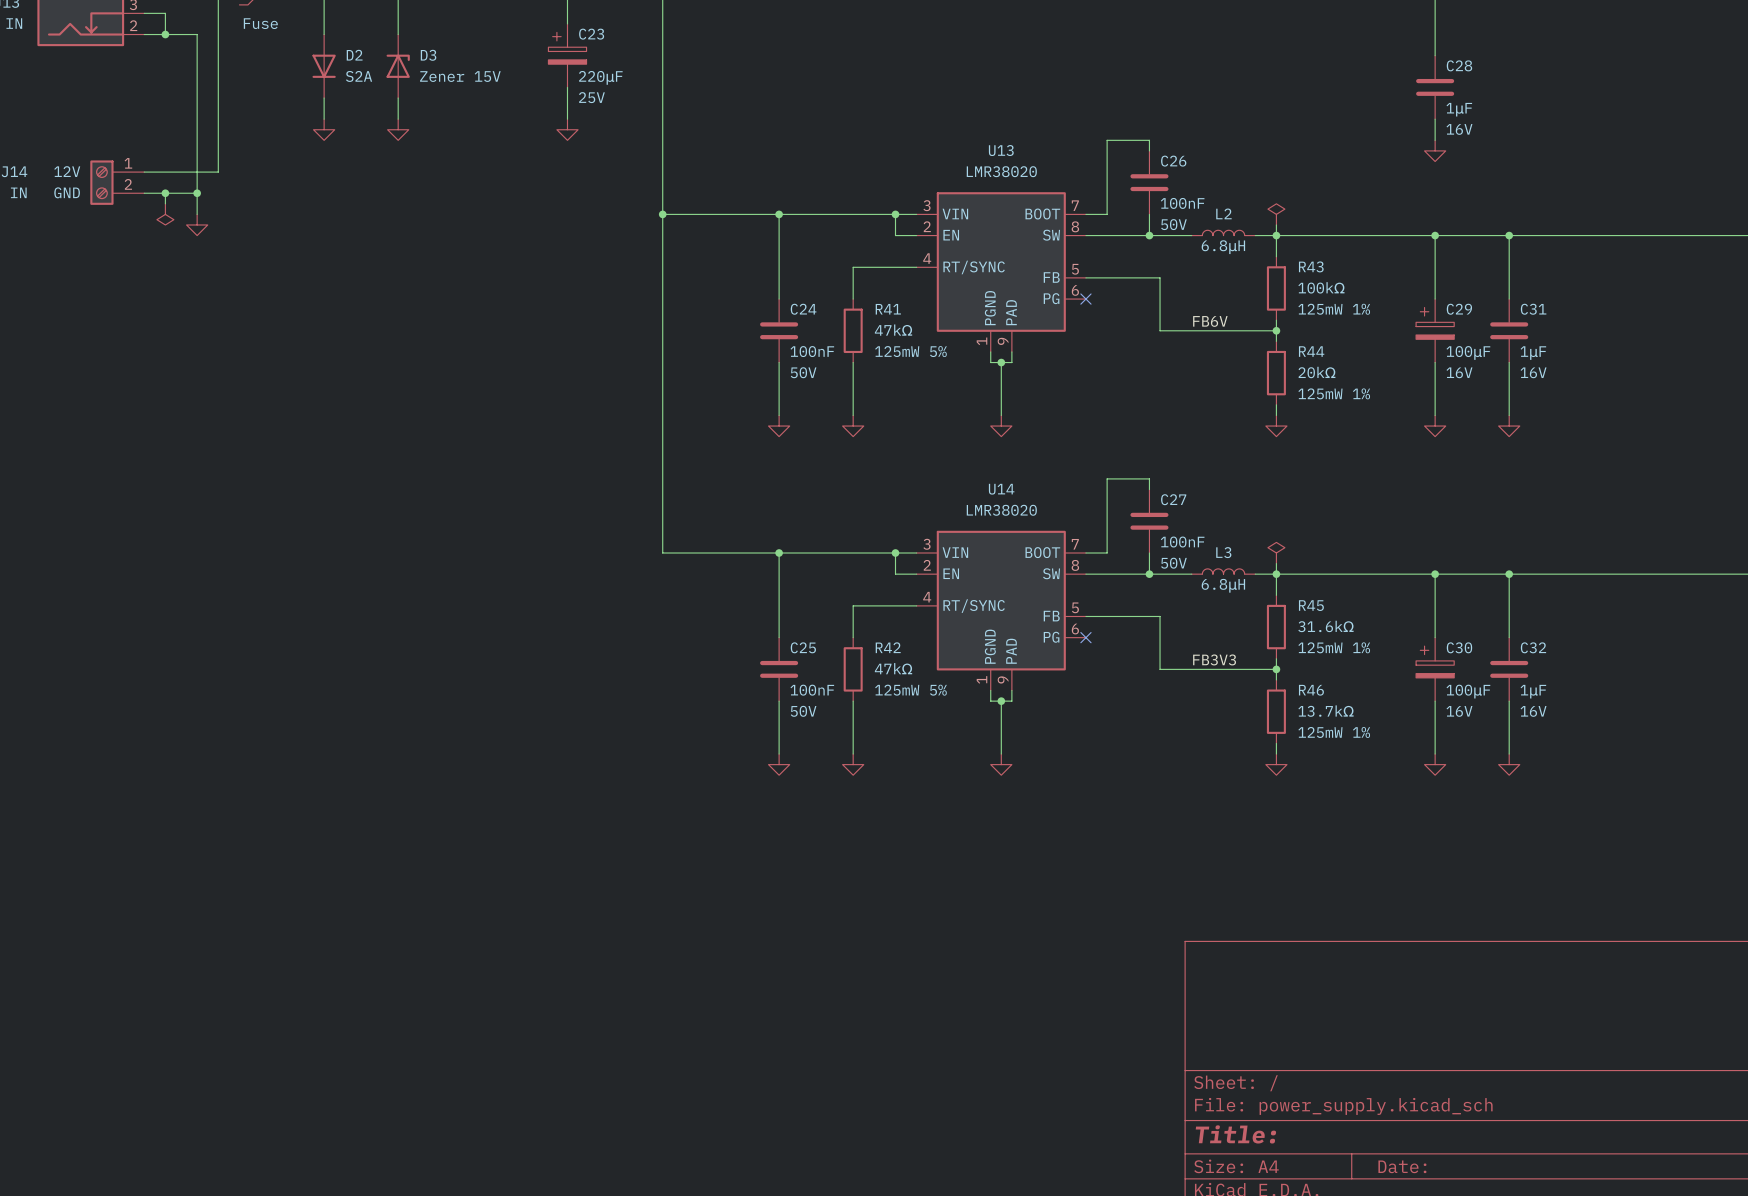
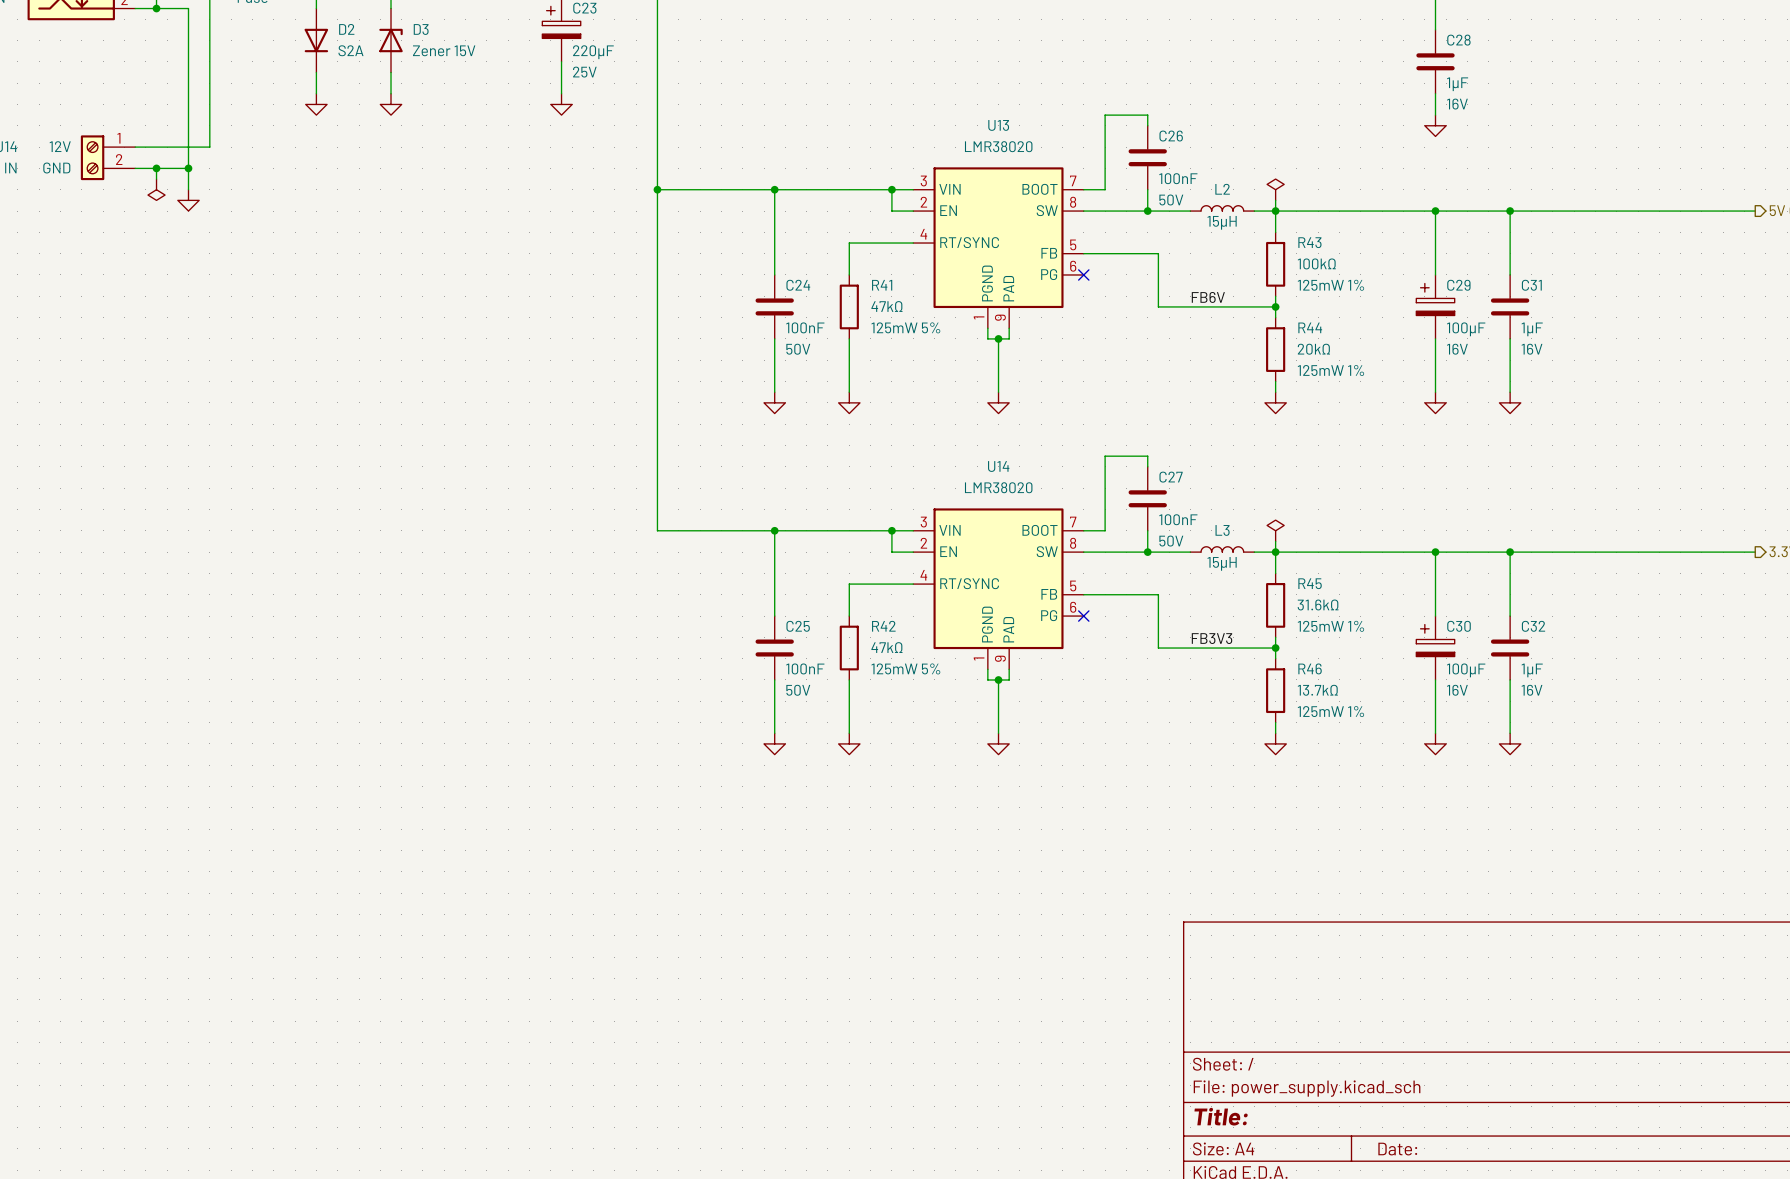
L2 value: 6.8μH (1223, 247) -> 15μH (1222, 222)
L3 value: 6.8μH (1223, 585) -> 15μH (1222, 563)

